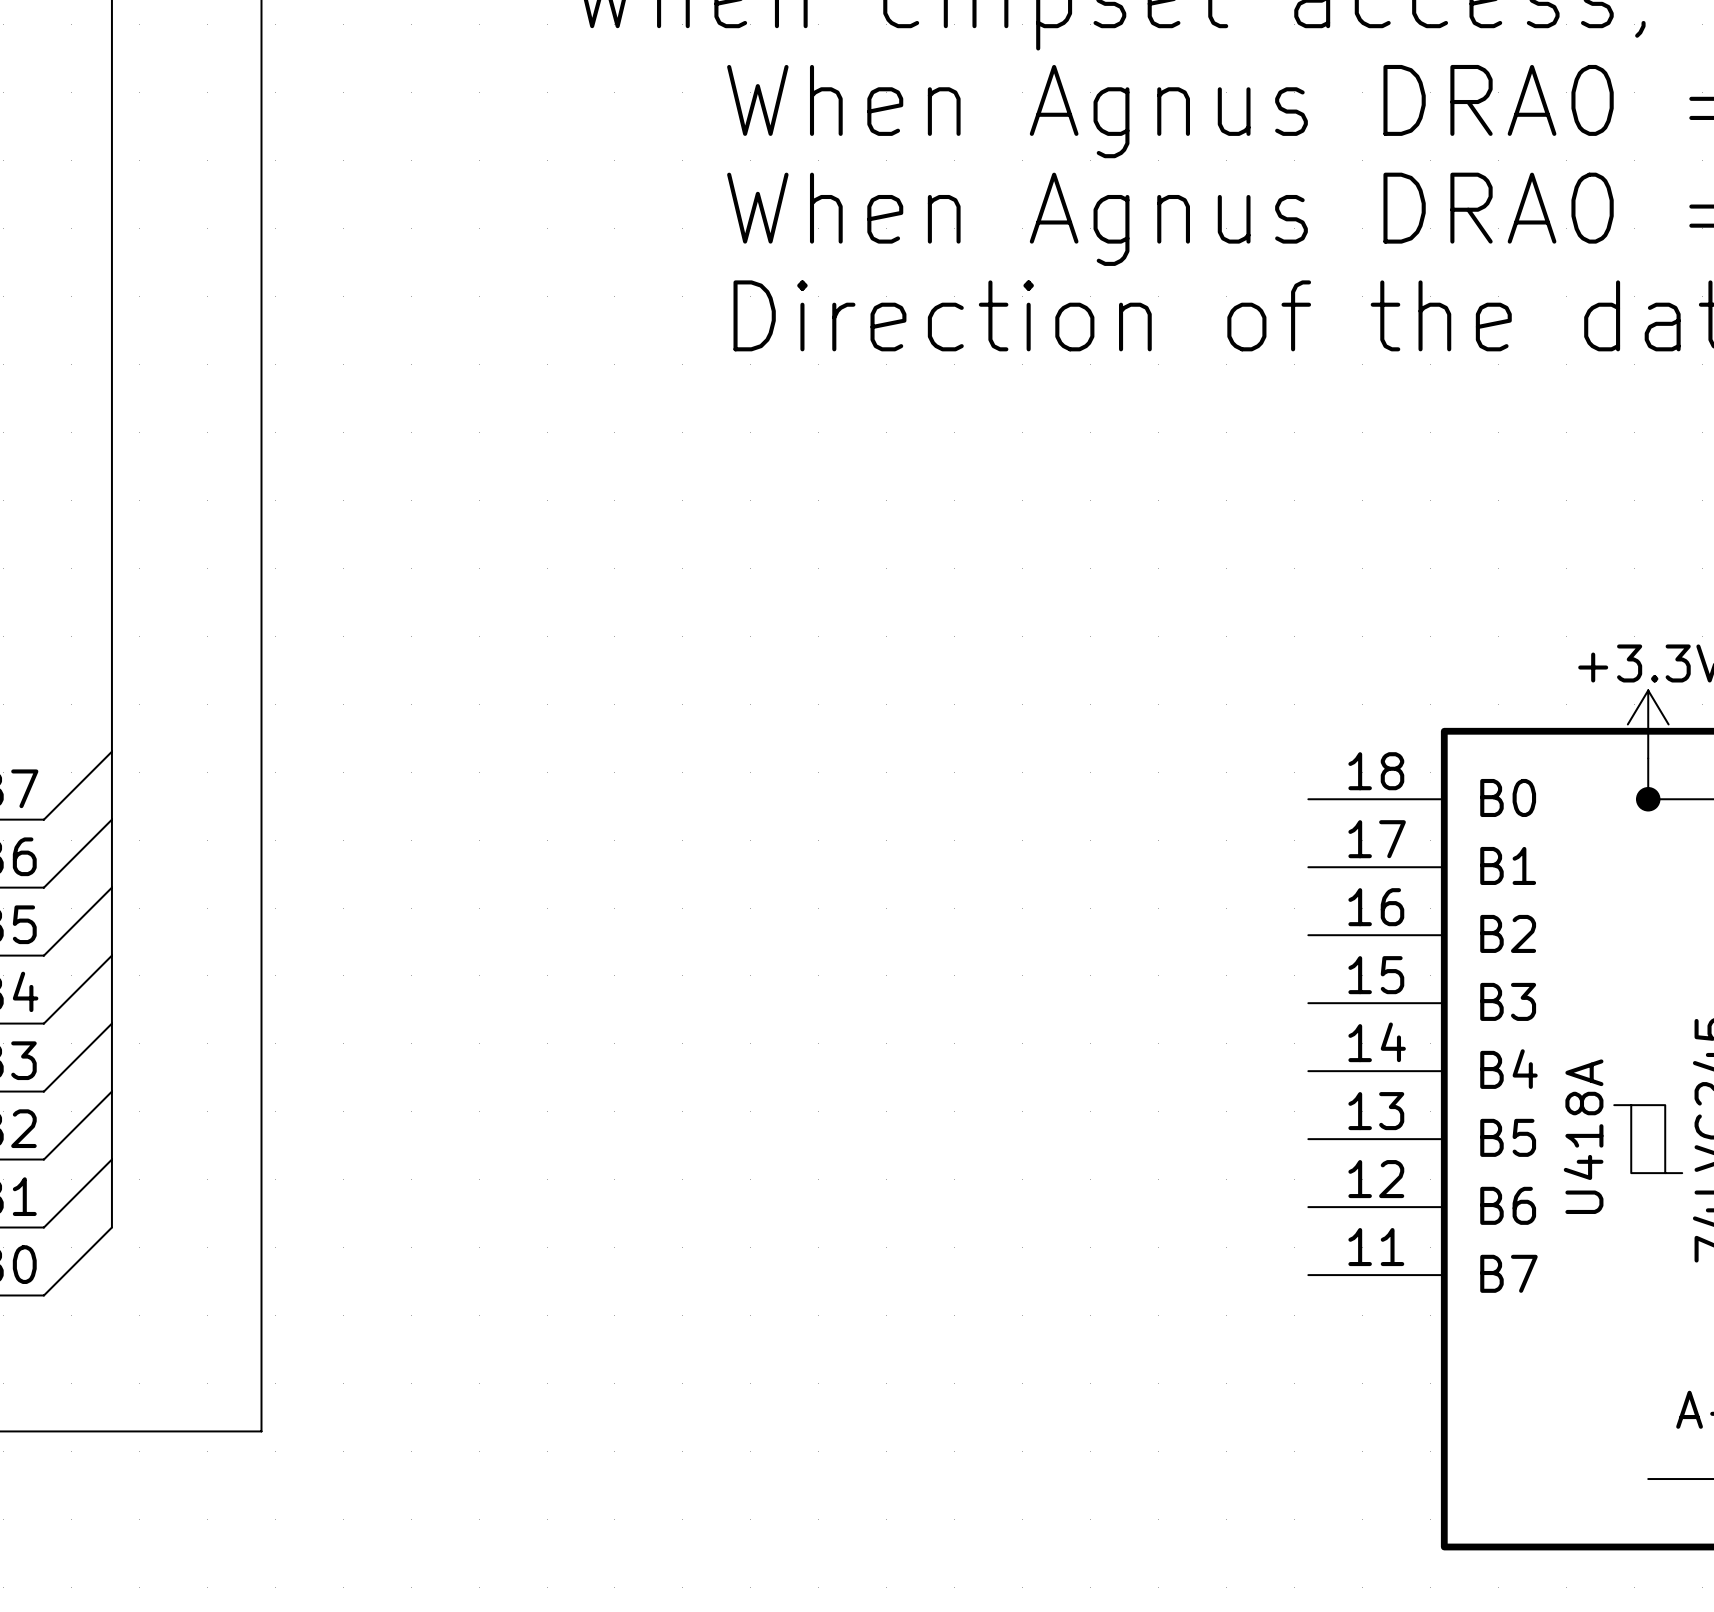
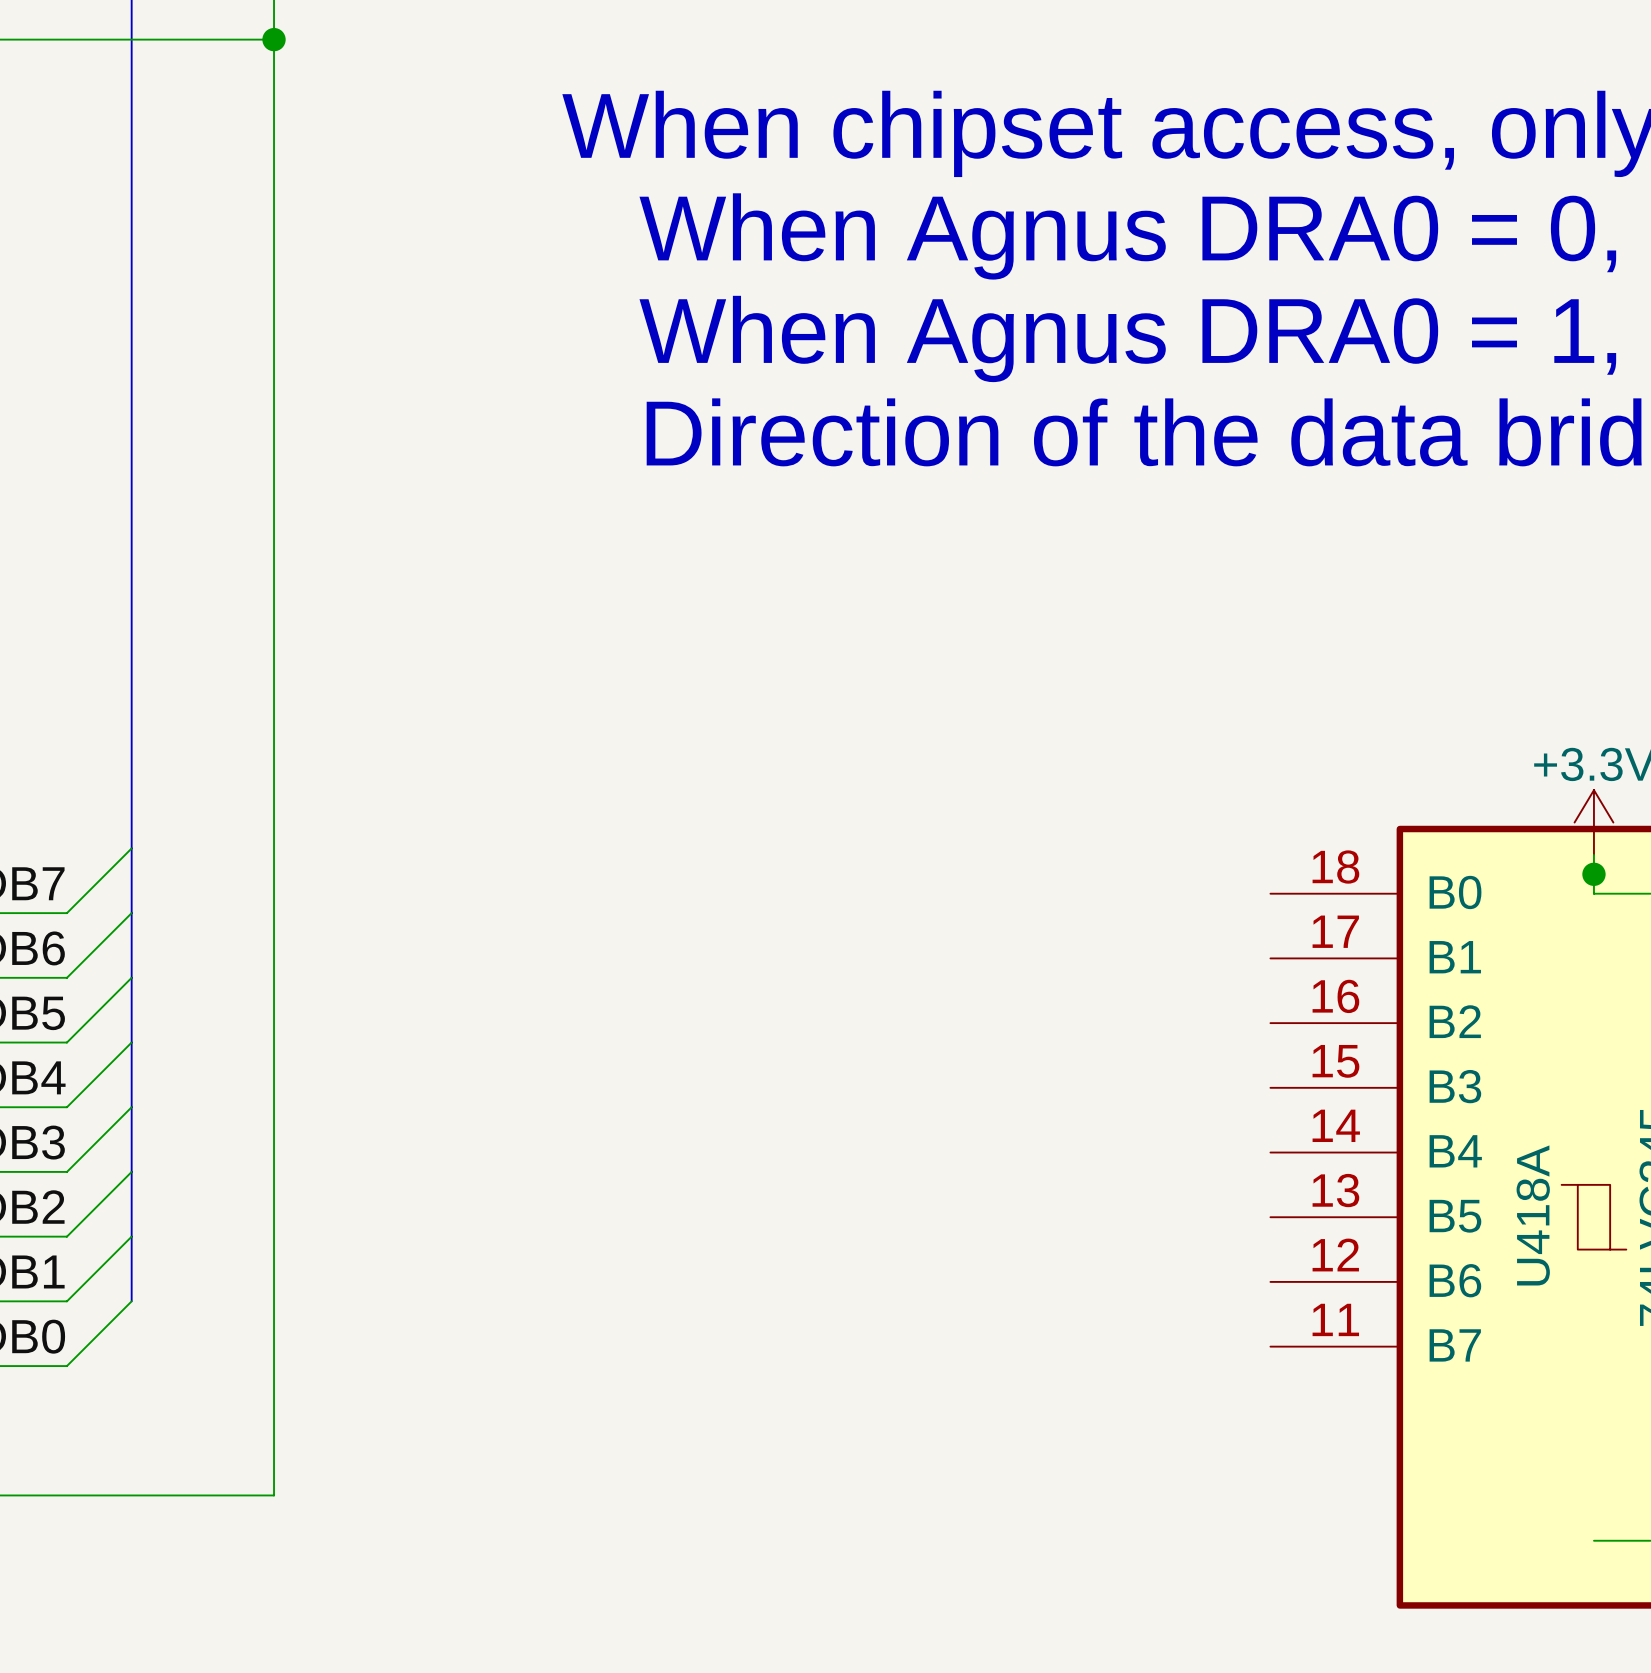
junction position: (1648, 799) -> (1593, 874)

